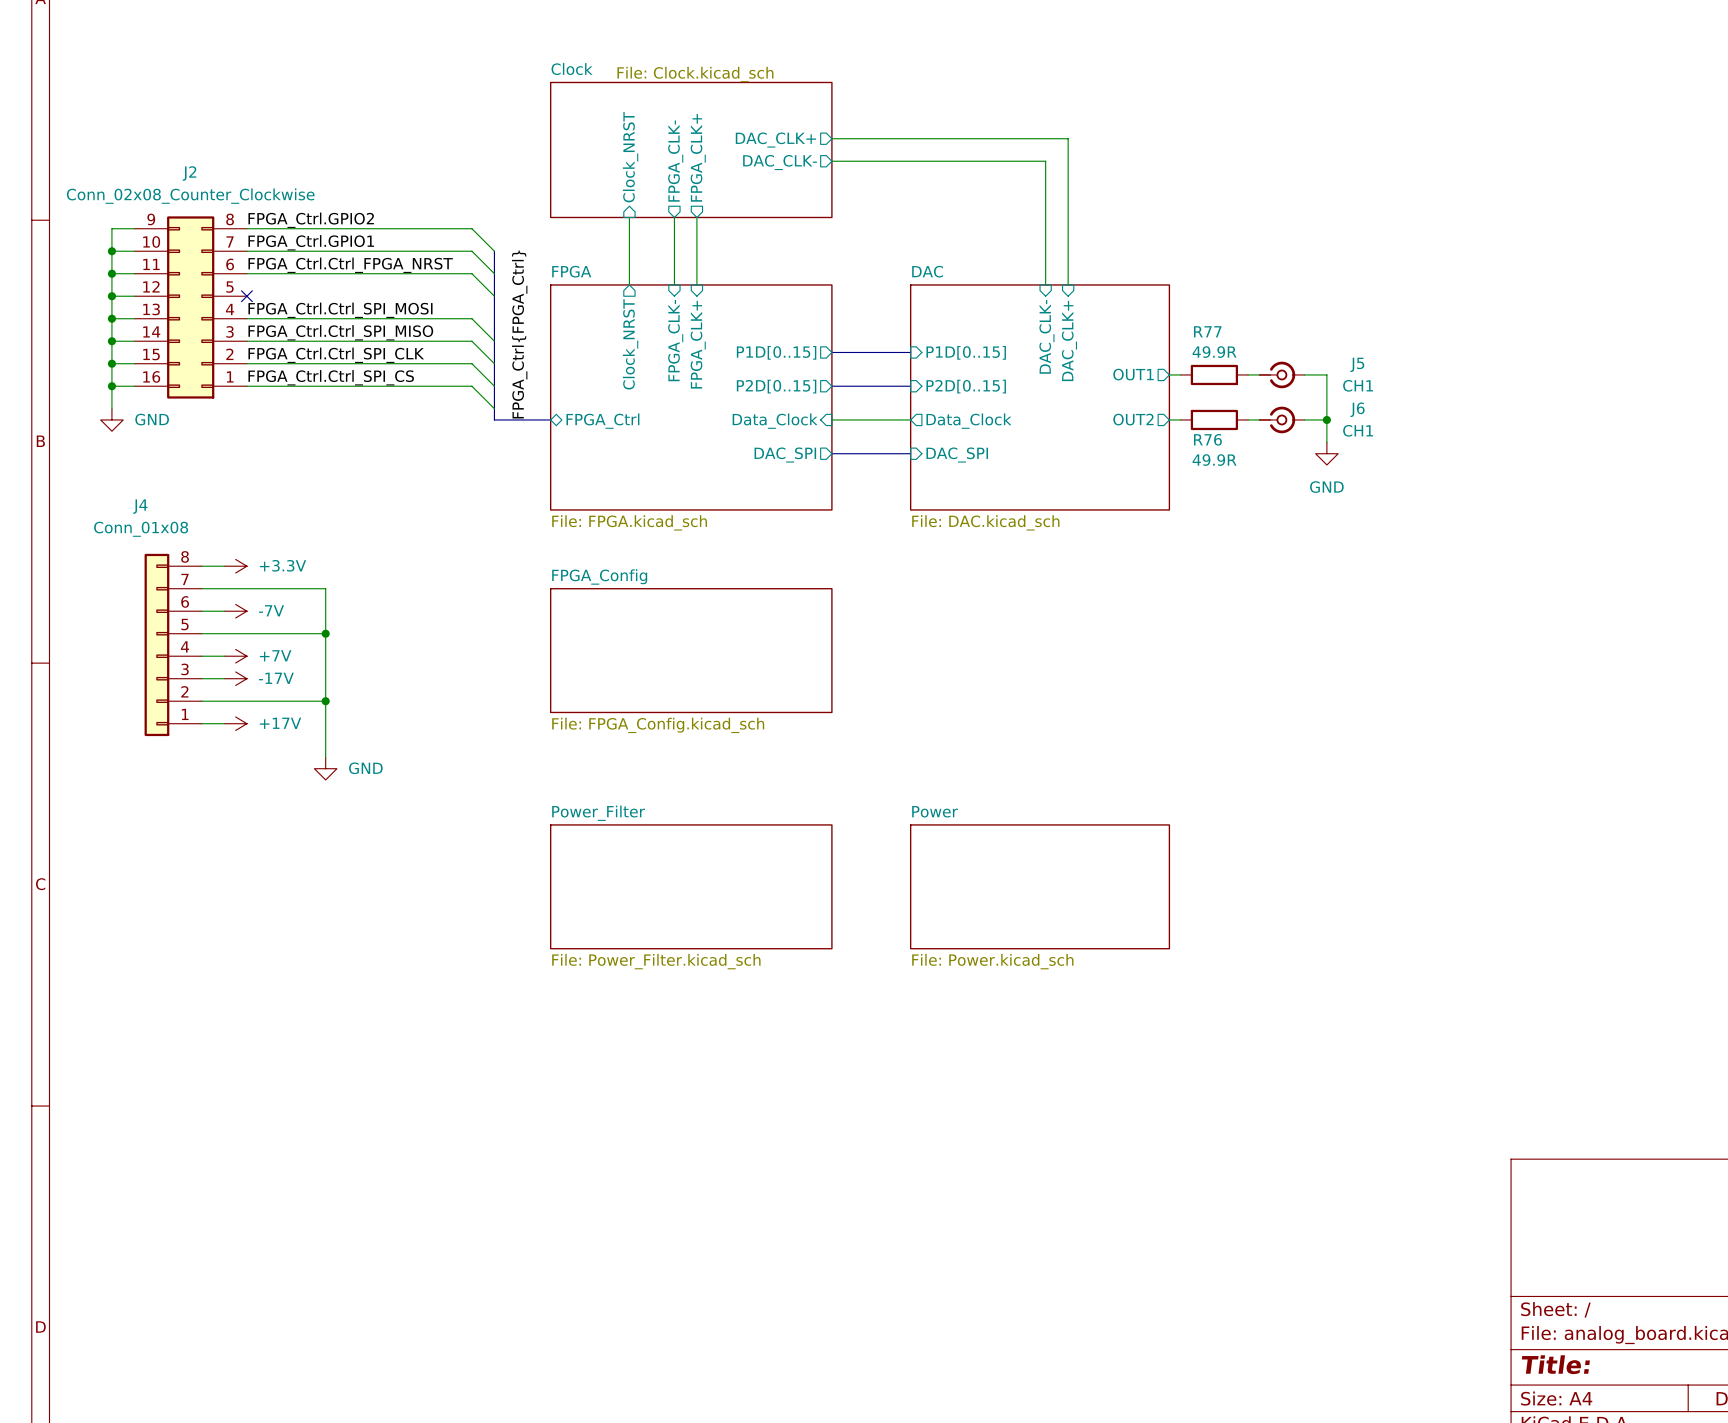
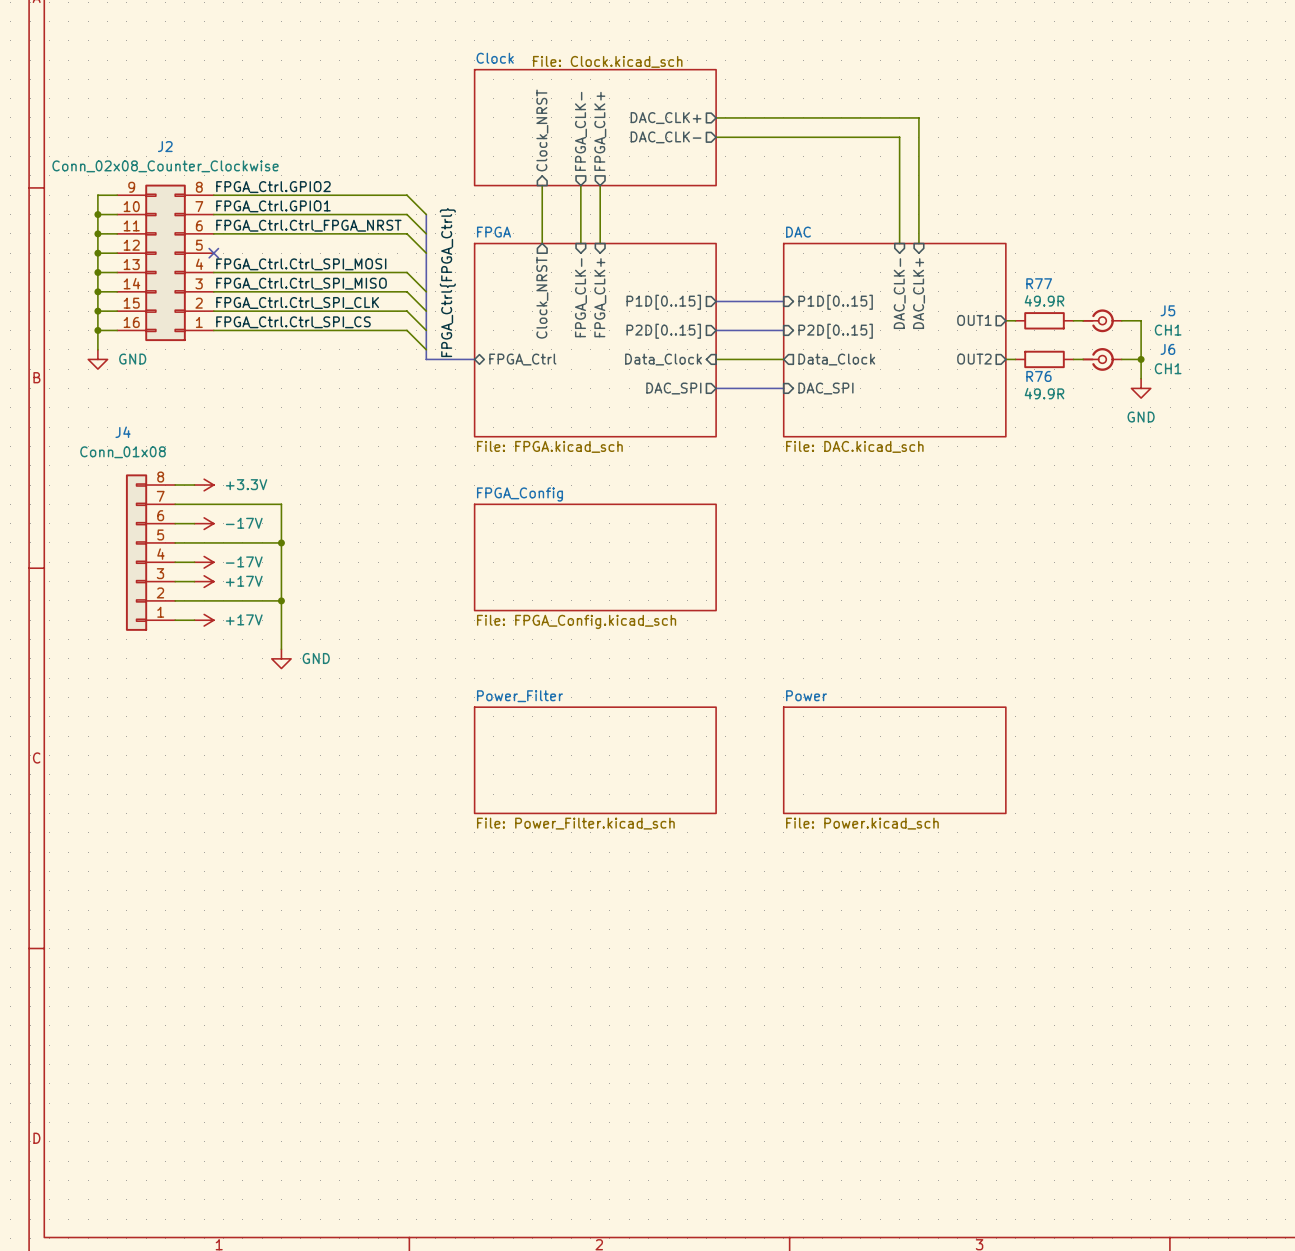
power symbol: -7V (235, 611) -> -17V (204, 523)
power symbol: +7V (235, 656) -> -17V (204, 562)
power symbol: -17V (235, 678) -> +17V (204, 581)

